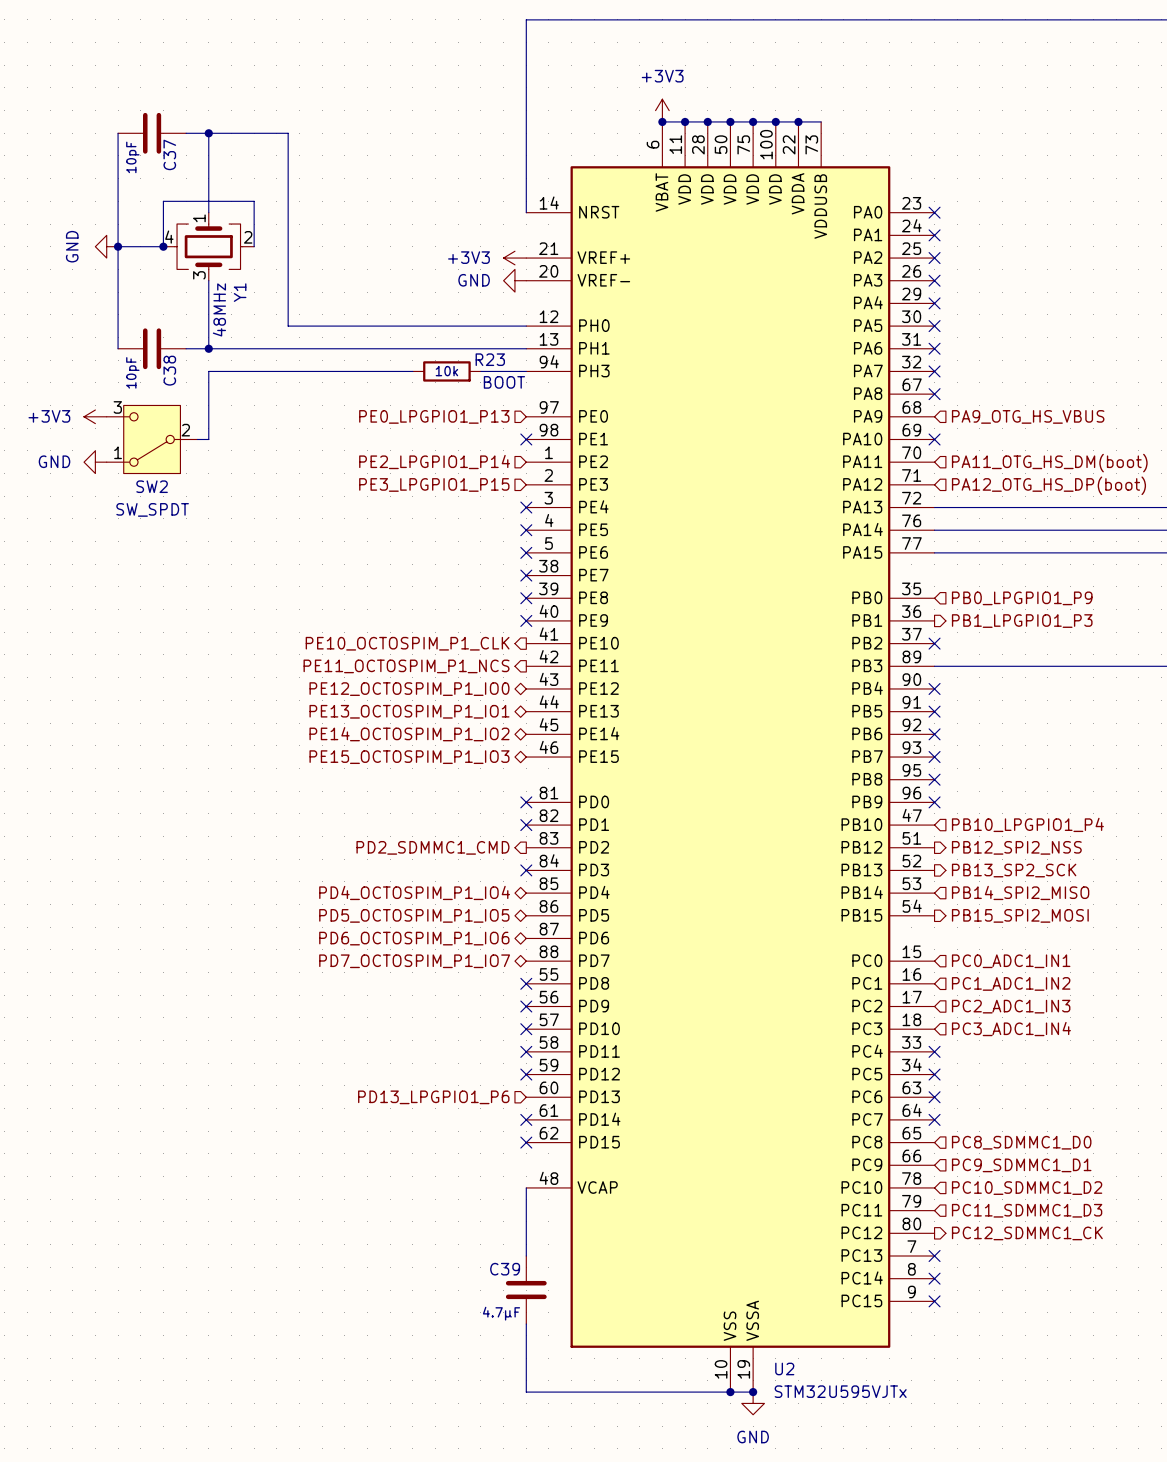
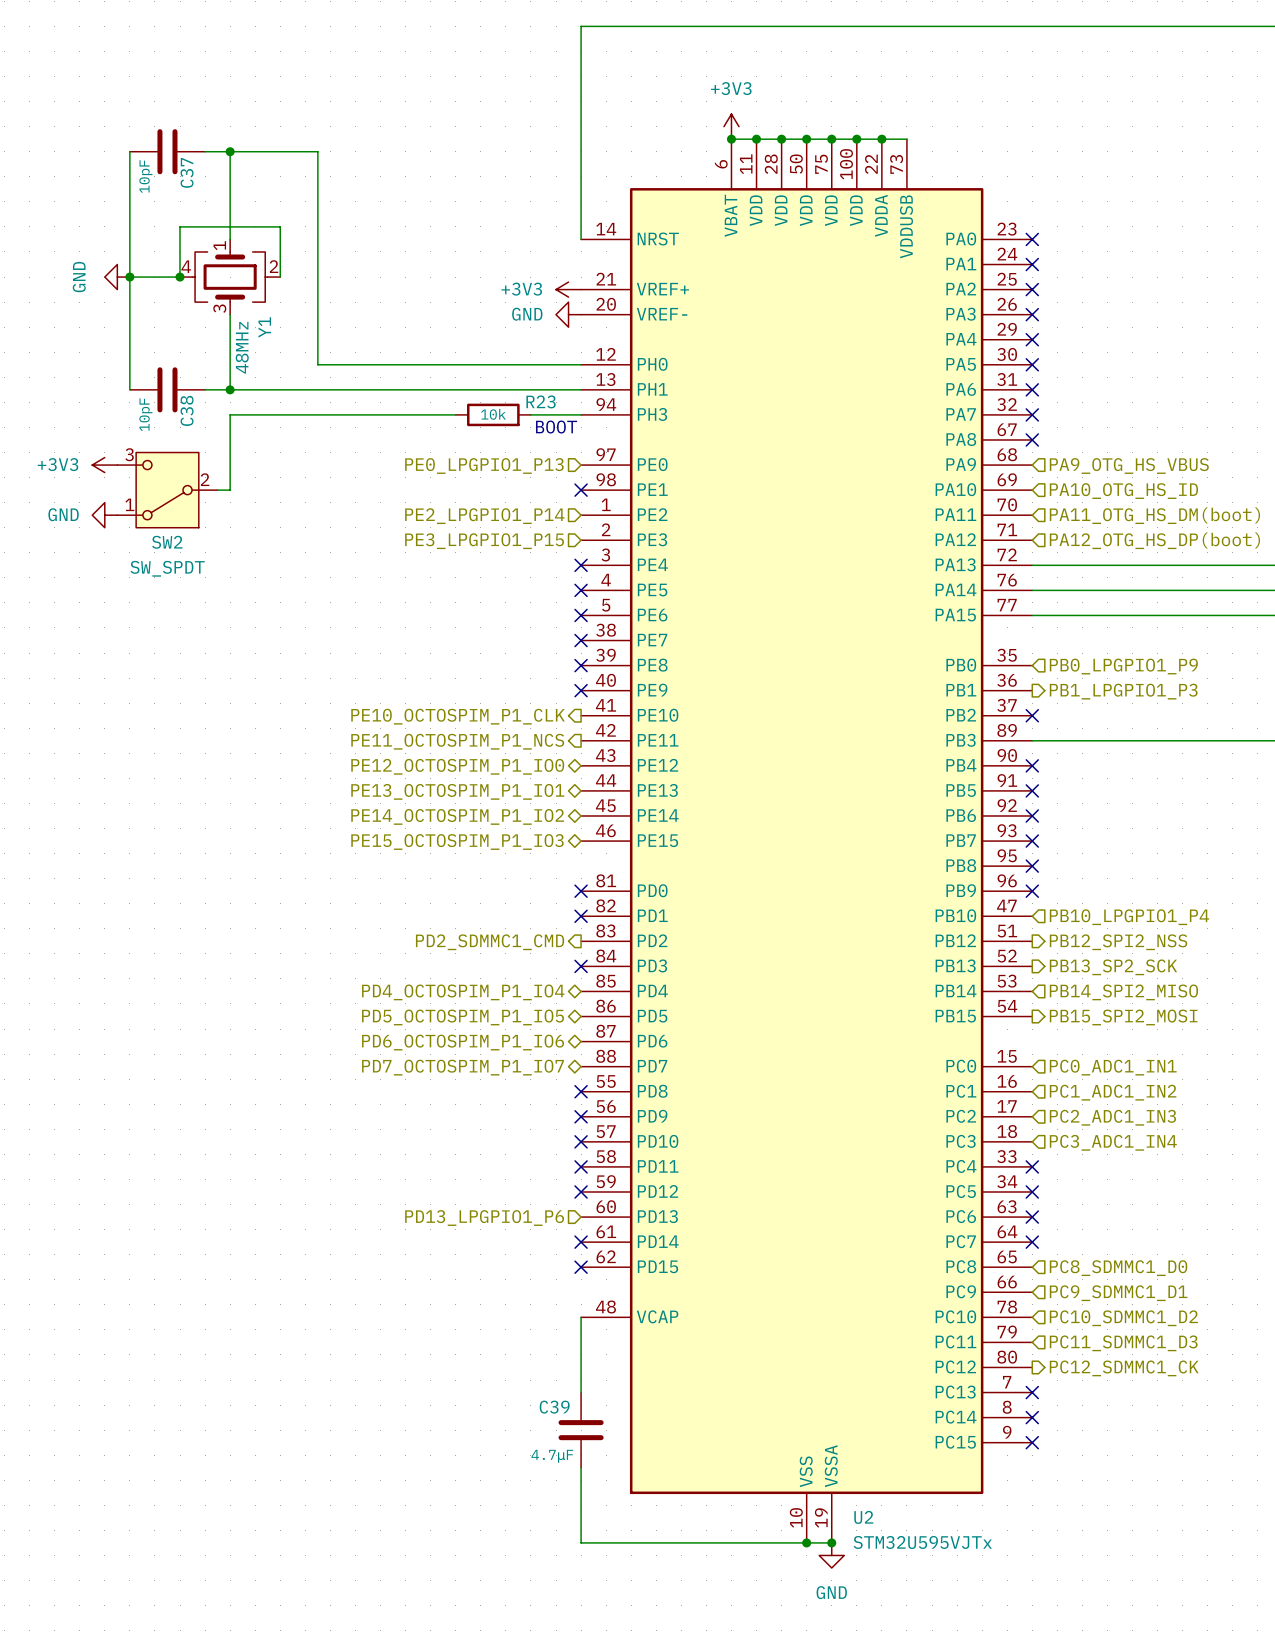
no-connect mark: (934, 439) -> none
hierarchical label: none -> PA10_OTG_HS_ID (1123, 491)

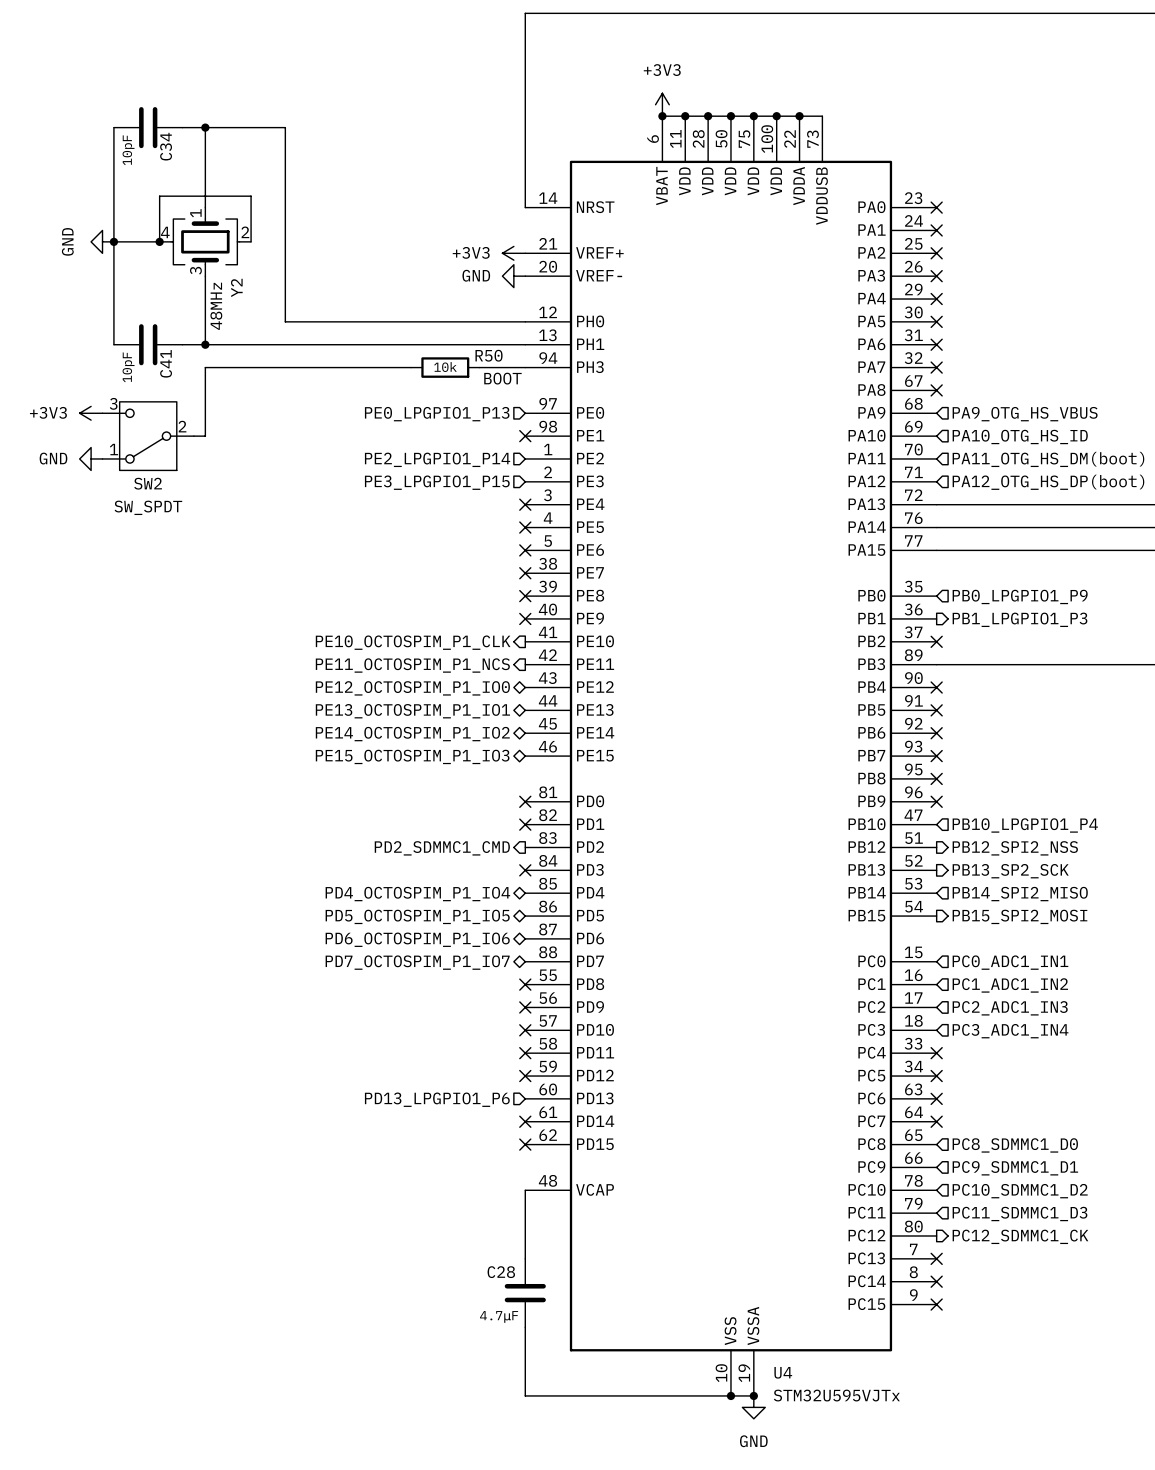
C37 name: C37 (187, 172) -> C34 (166, 146)
Y1 name: Y1 (264, 327) -> Y2 (236, 287)
R23 name: R23 (541, 401) -> R50 (489, 355)
C38 name: C38 (187, 410) -> C41 (166, 363)
C39 name: C39 (554, 1407) -> C28 (501, 1272)
U2 name: U2 (863, 1517) -> U4 (783, 1372)

